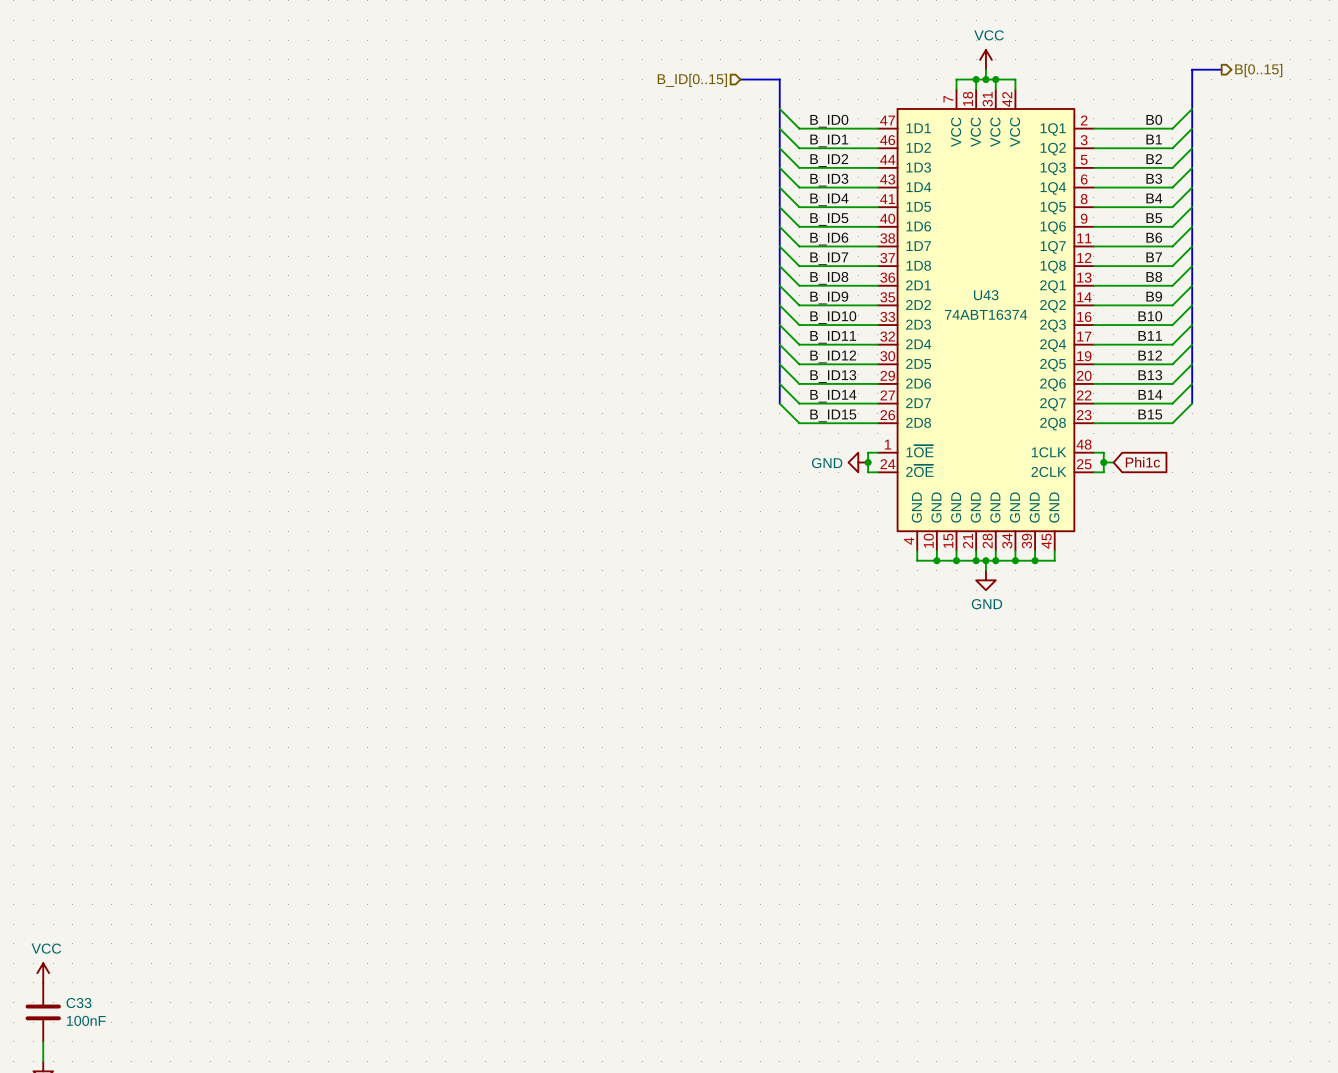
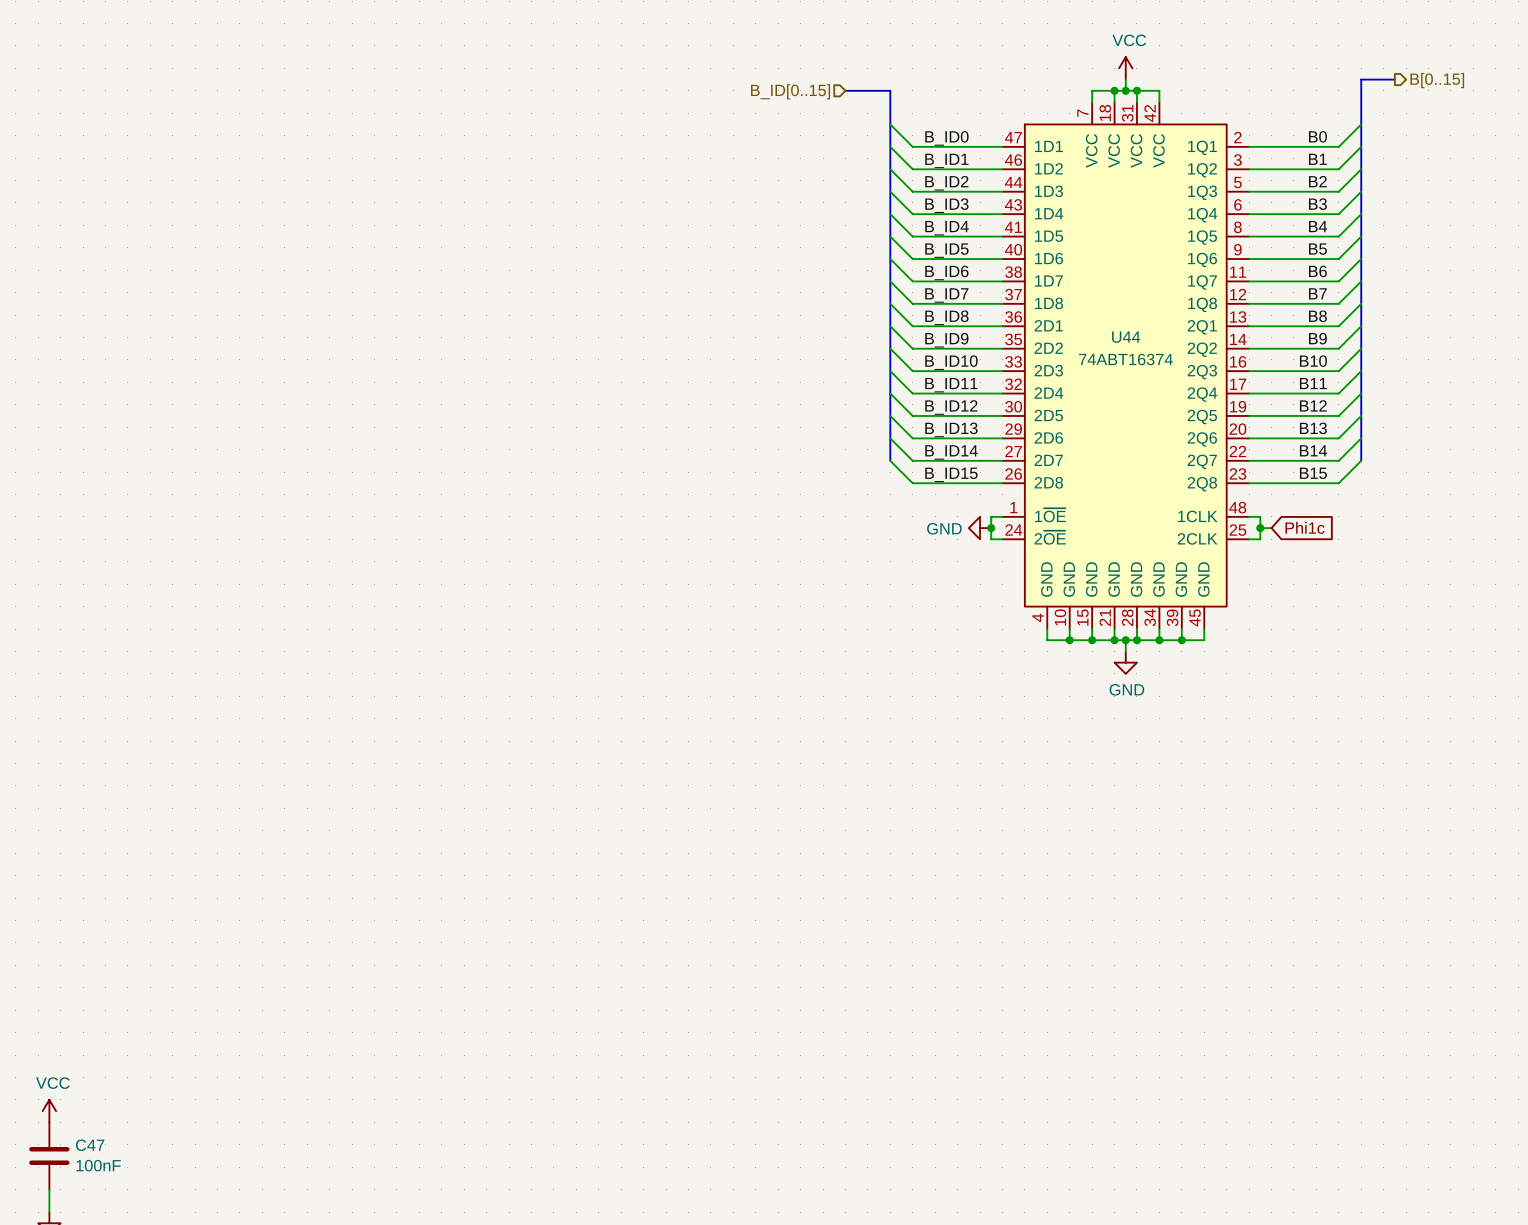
U43 name: U43 (986, 295) -> U44 (1126, 337)
C33 name: C33 (78, 1003) -> C47 (90, 1145)

